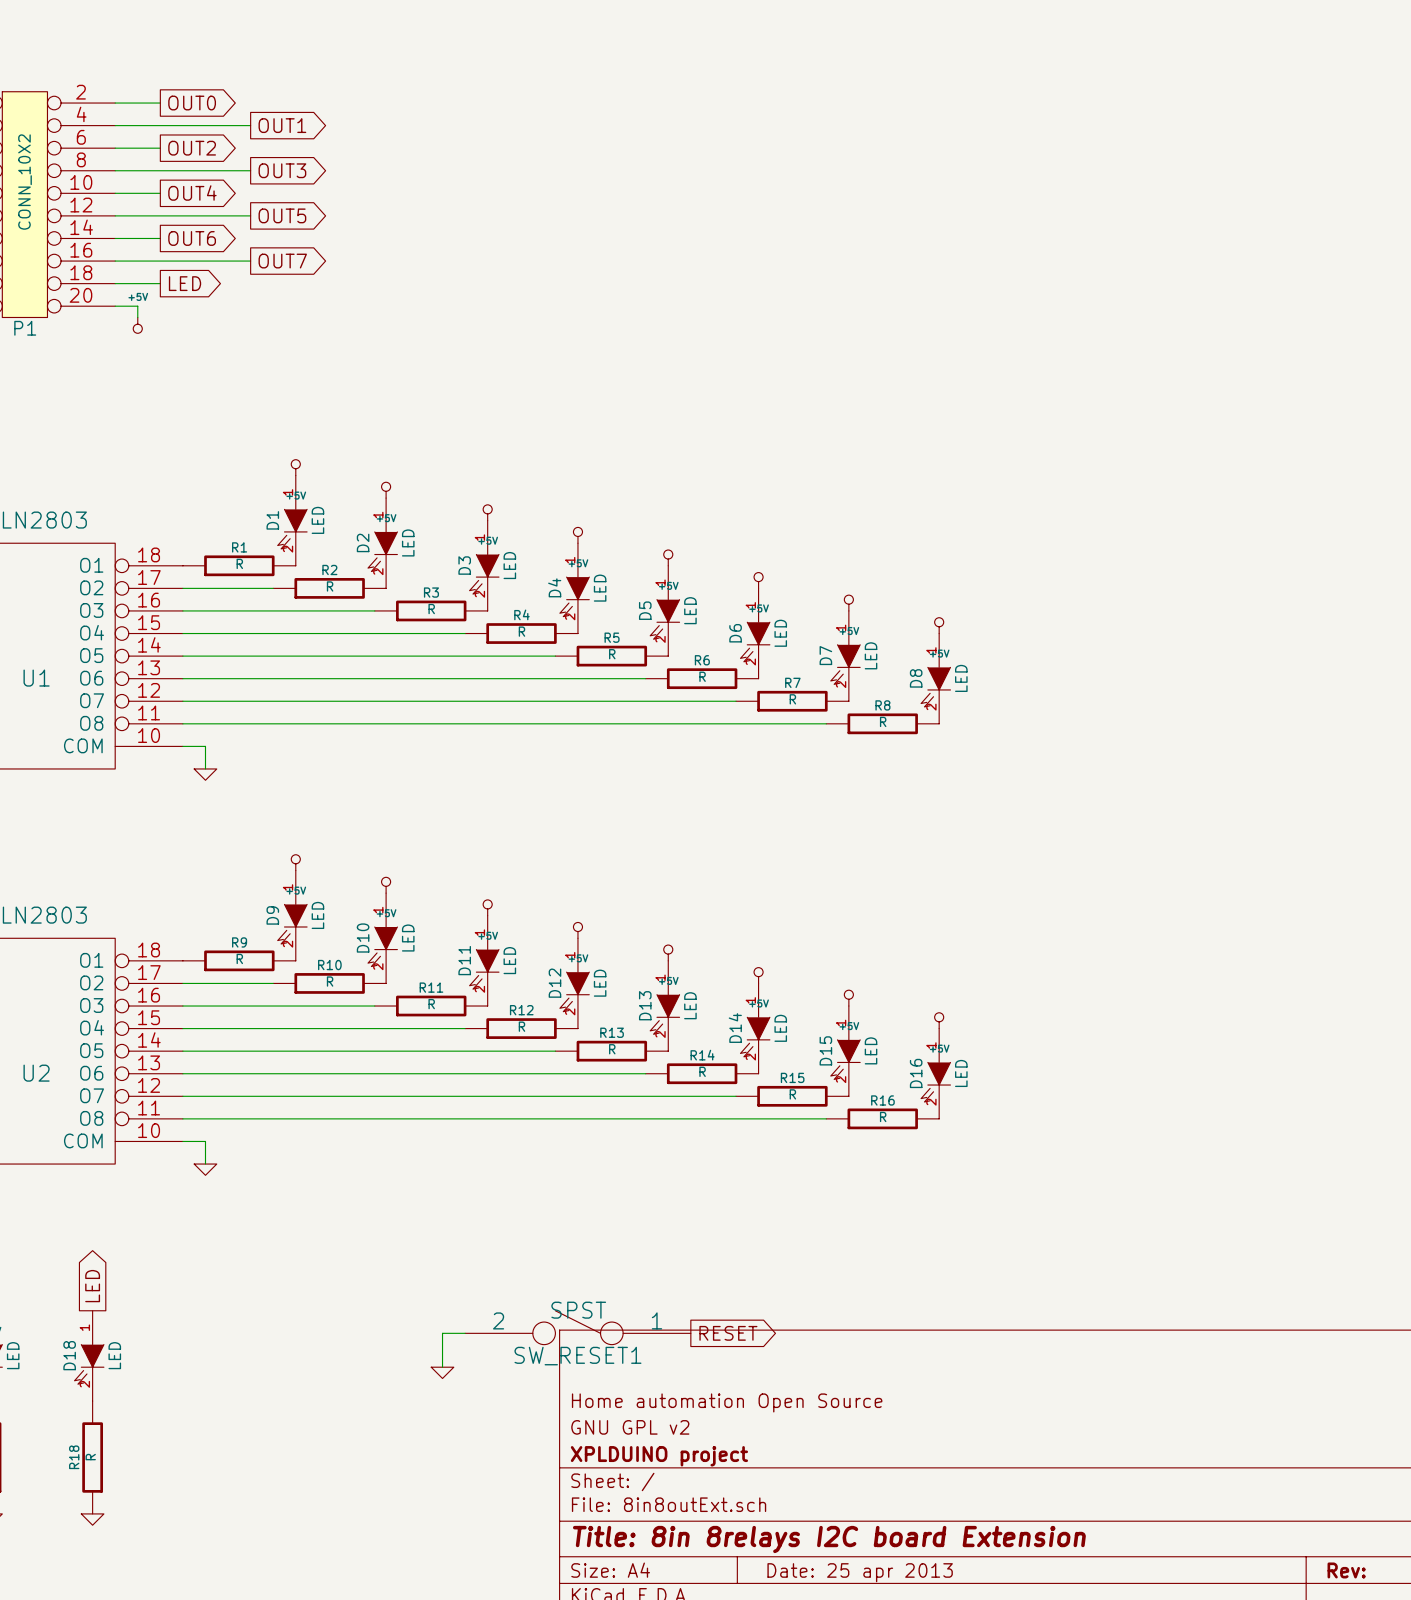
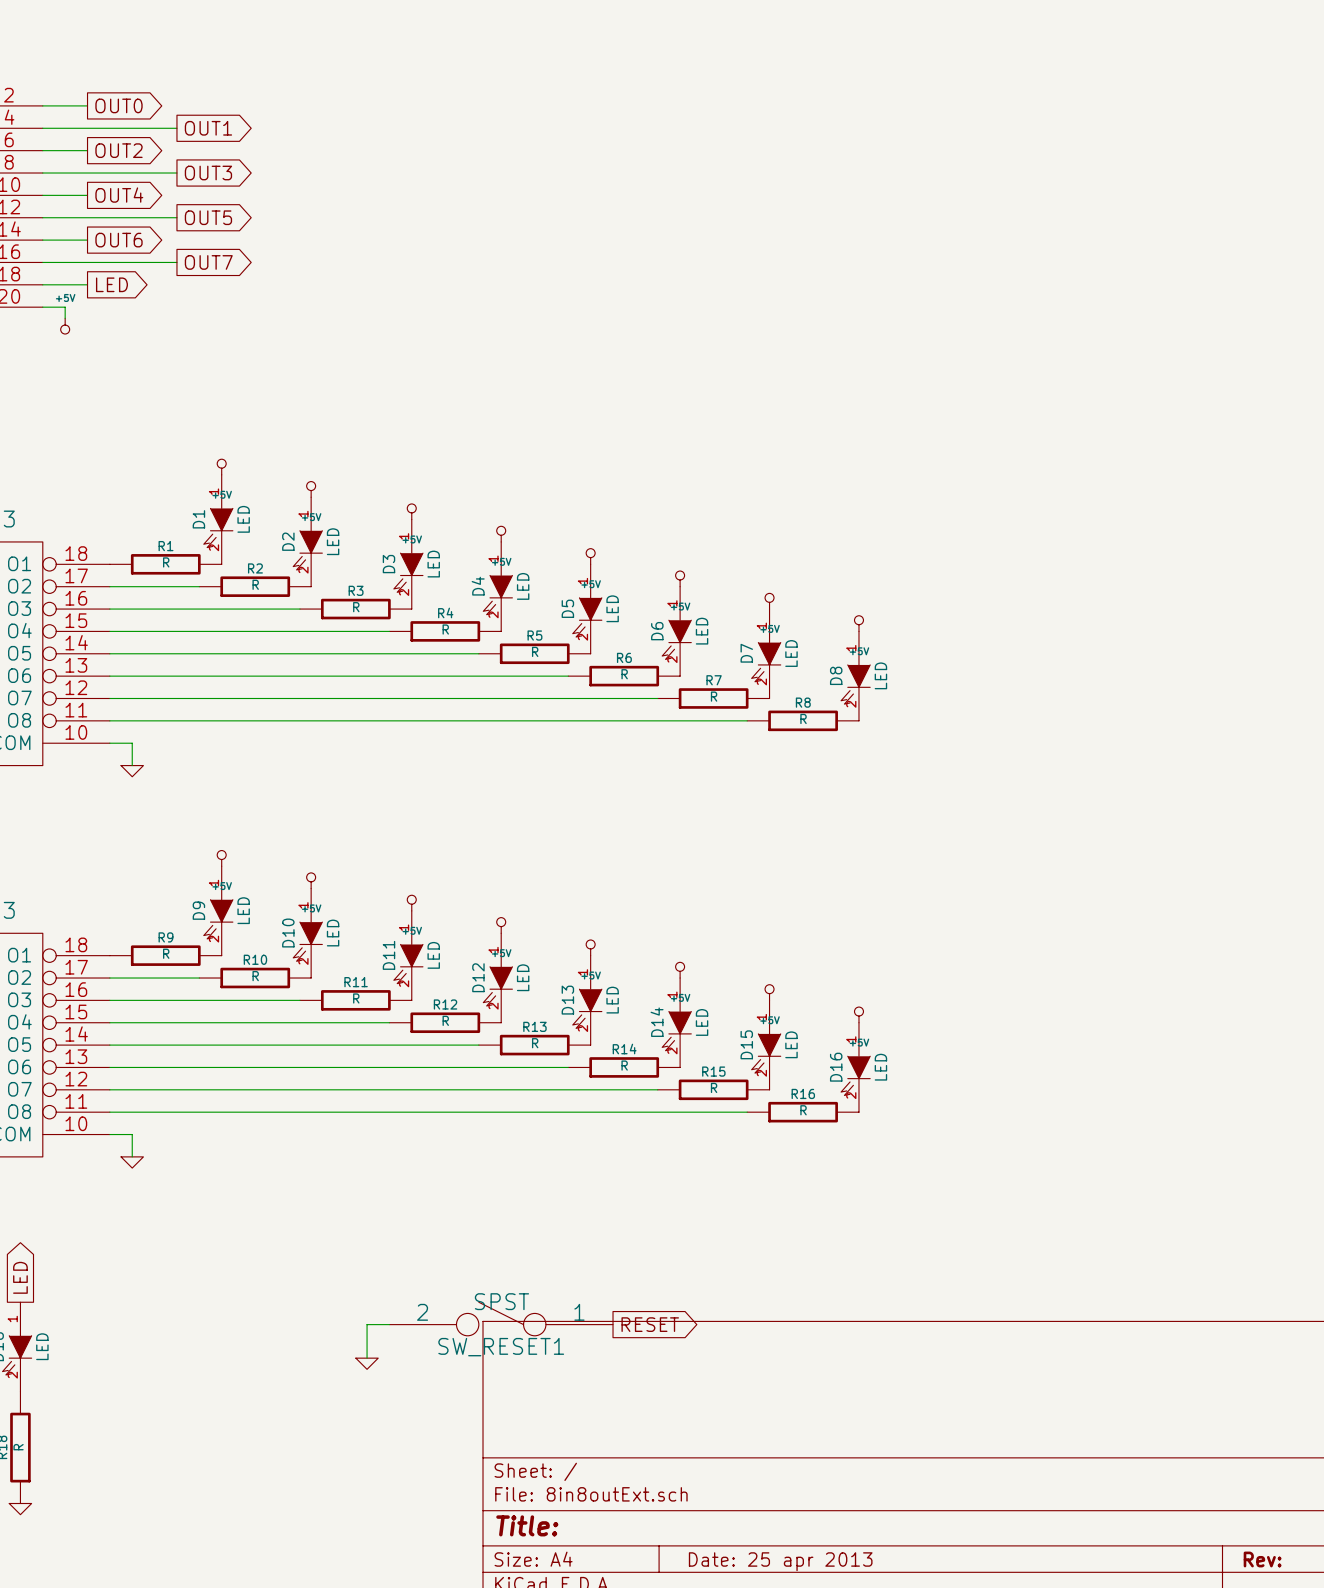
title block: Home automation Open Source (727, 1402) -> none
title block: GNU GPL v2 (630, 1427) -> none
title block: XPLDUINO project (659, 1456) -> none
title block: Title: 8in 8relays I2C board Extension (829, 1539) -> Title: (527, 1525)

